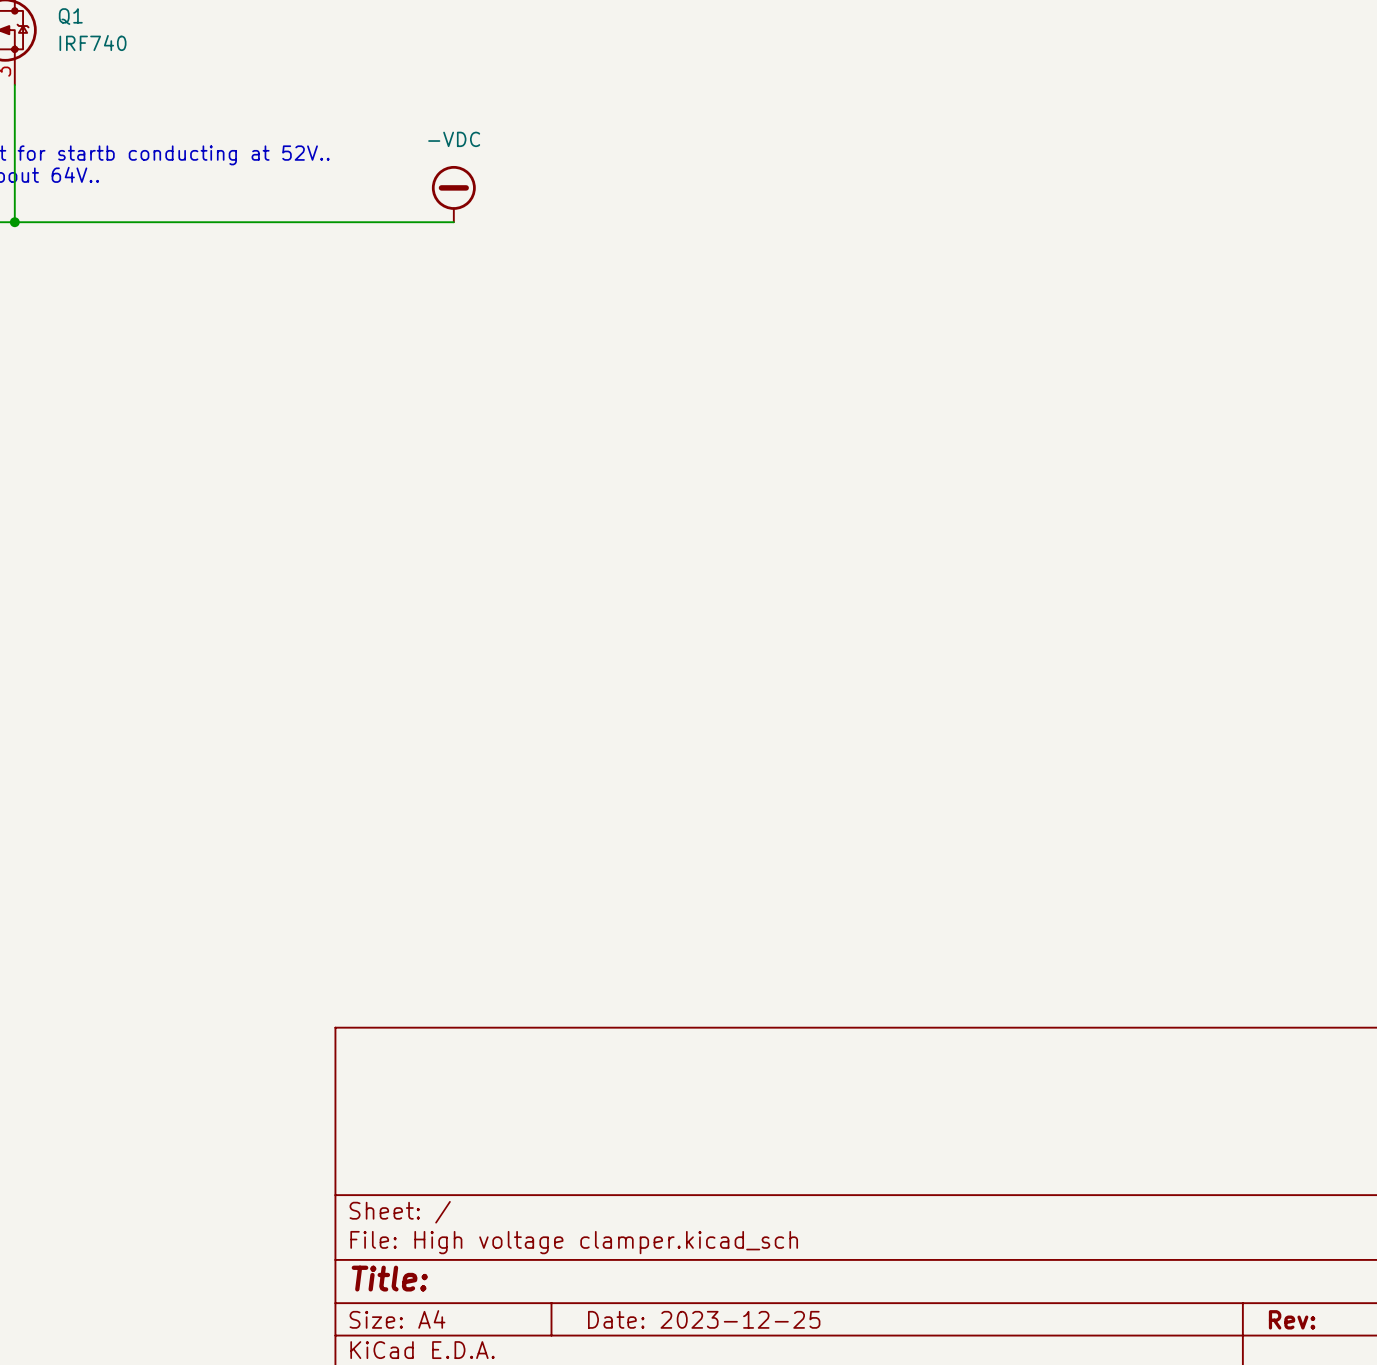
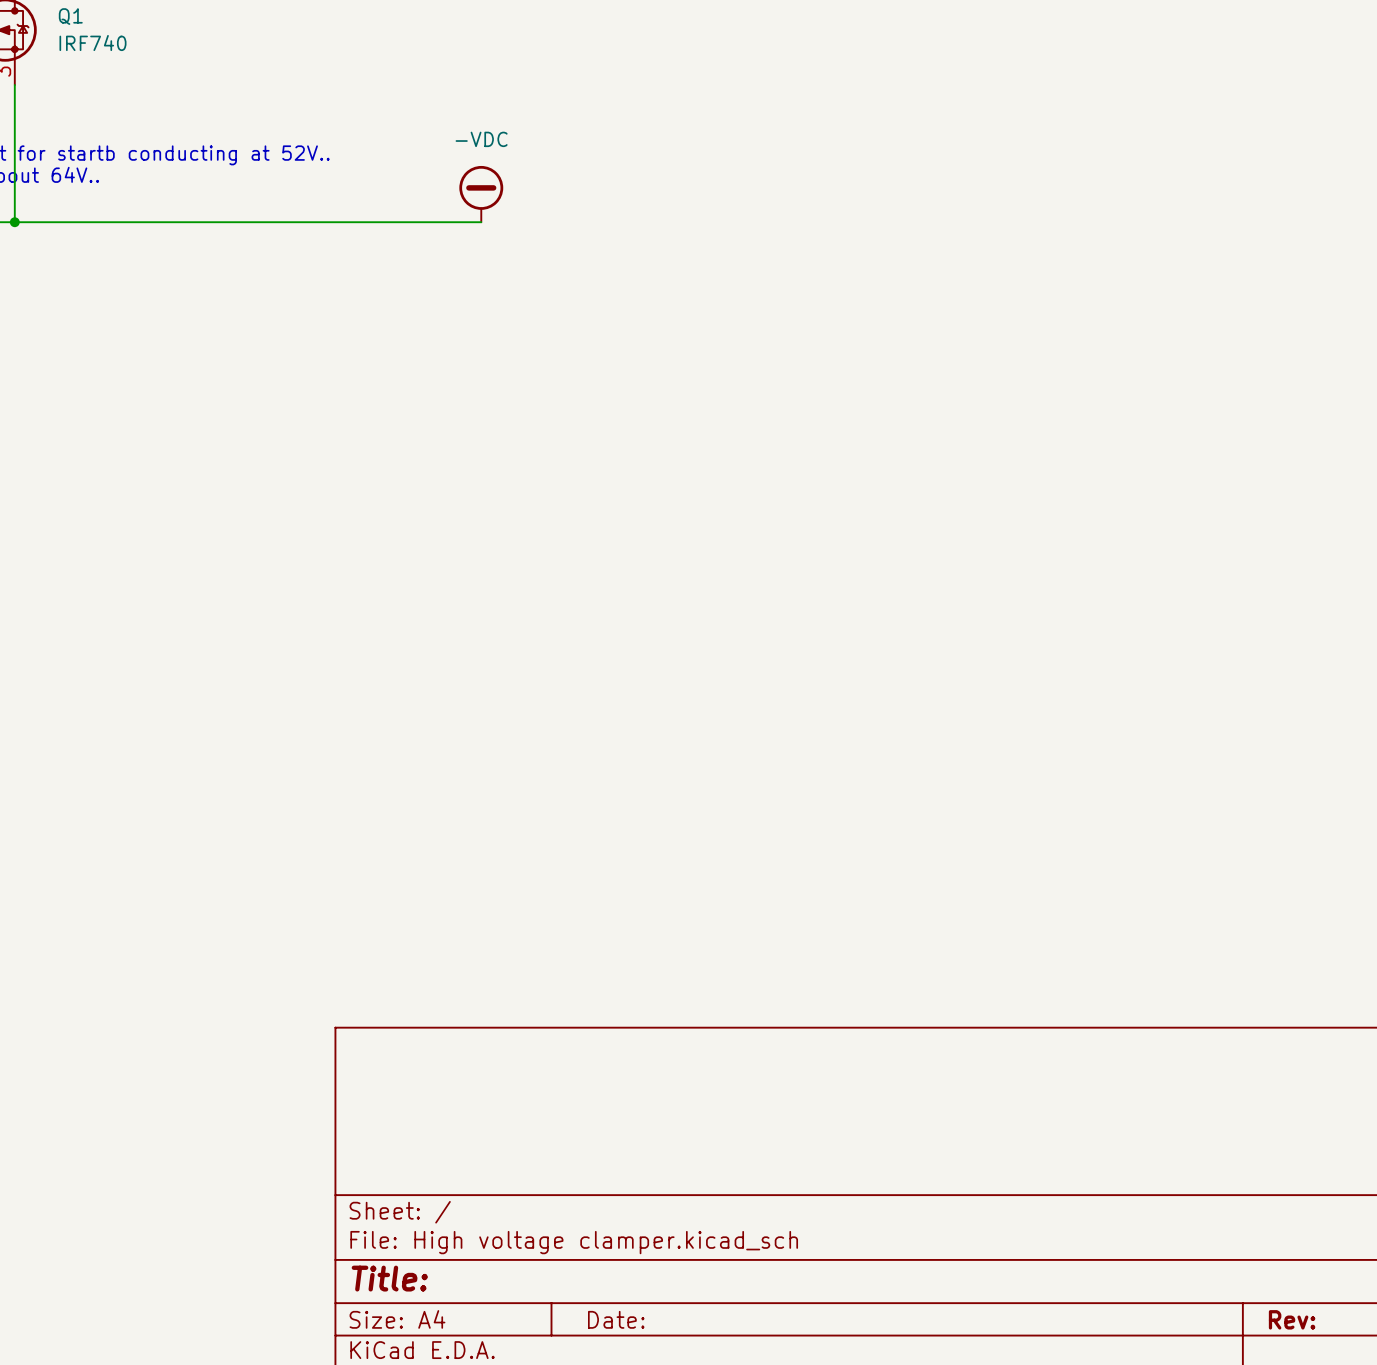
power symbol position: -VDC (453, 194) -> -VDC (481, 194)
wire: none -> (453, 222) (481, 222)
title block: Date: 2023-12-25 (704, 1319) -> Date: (616, 1319)

